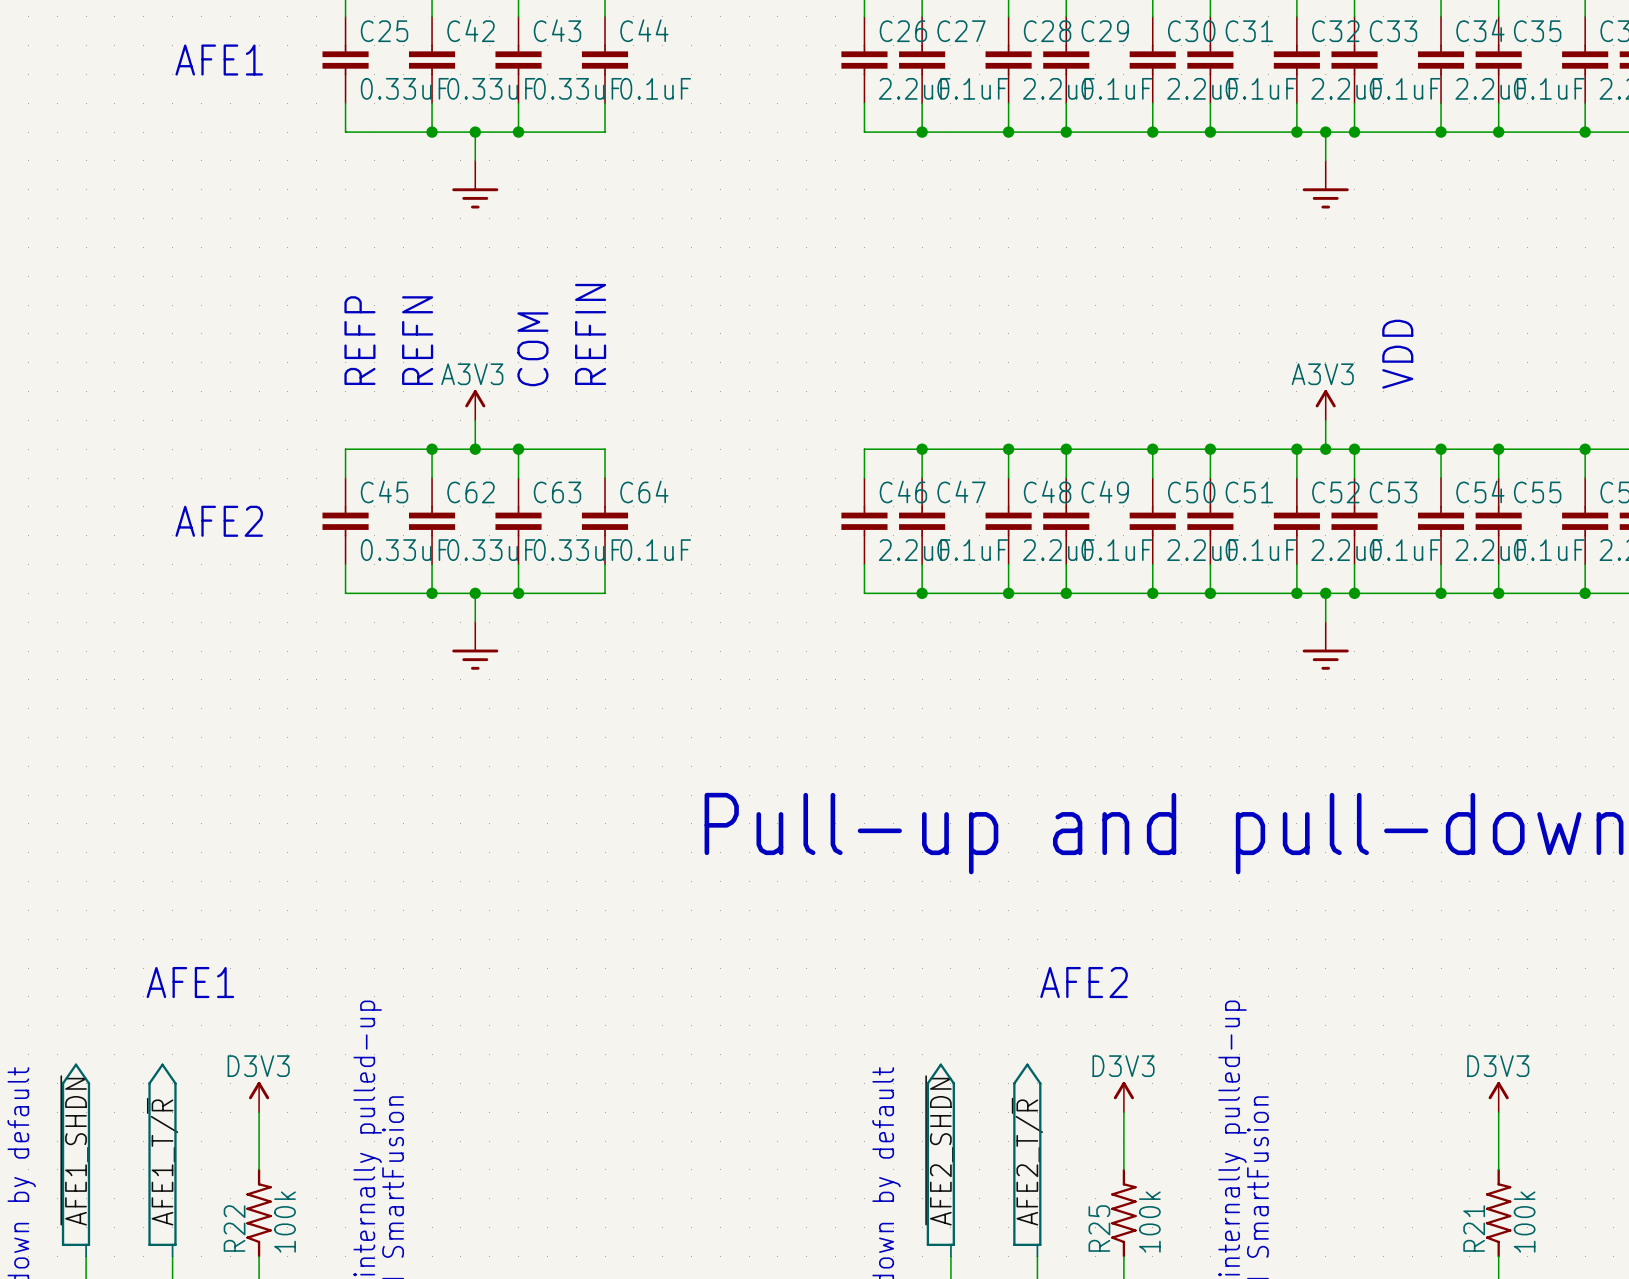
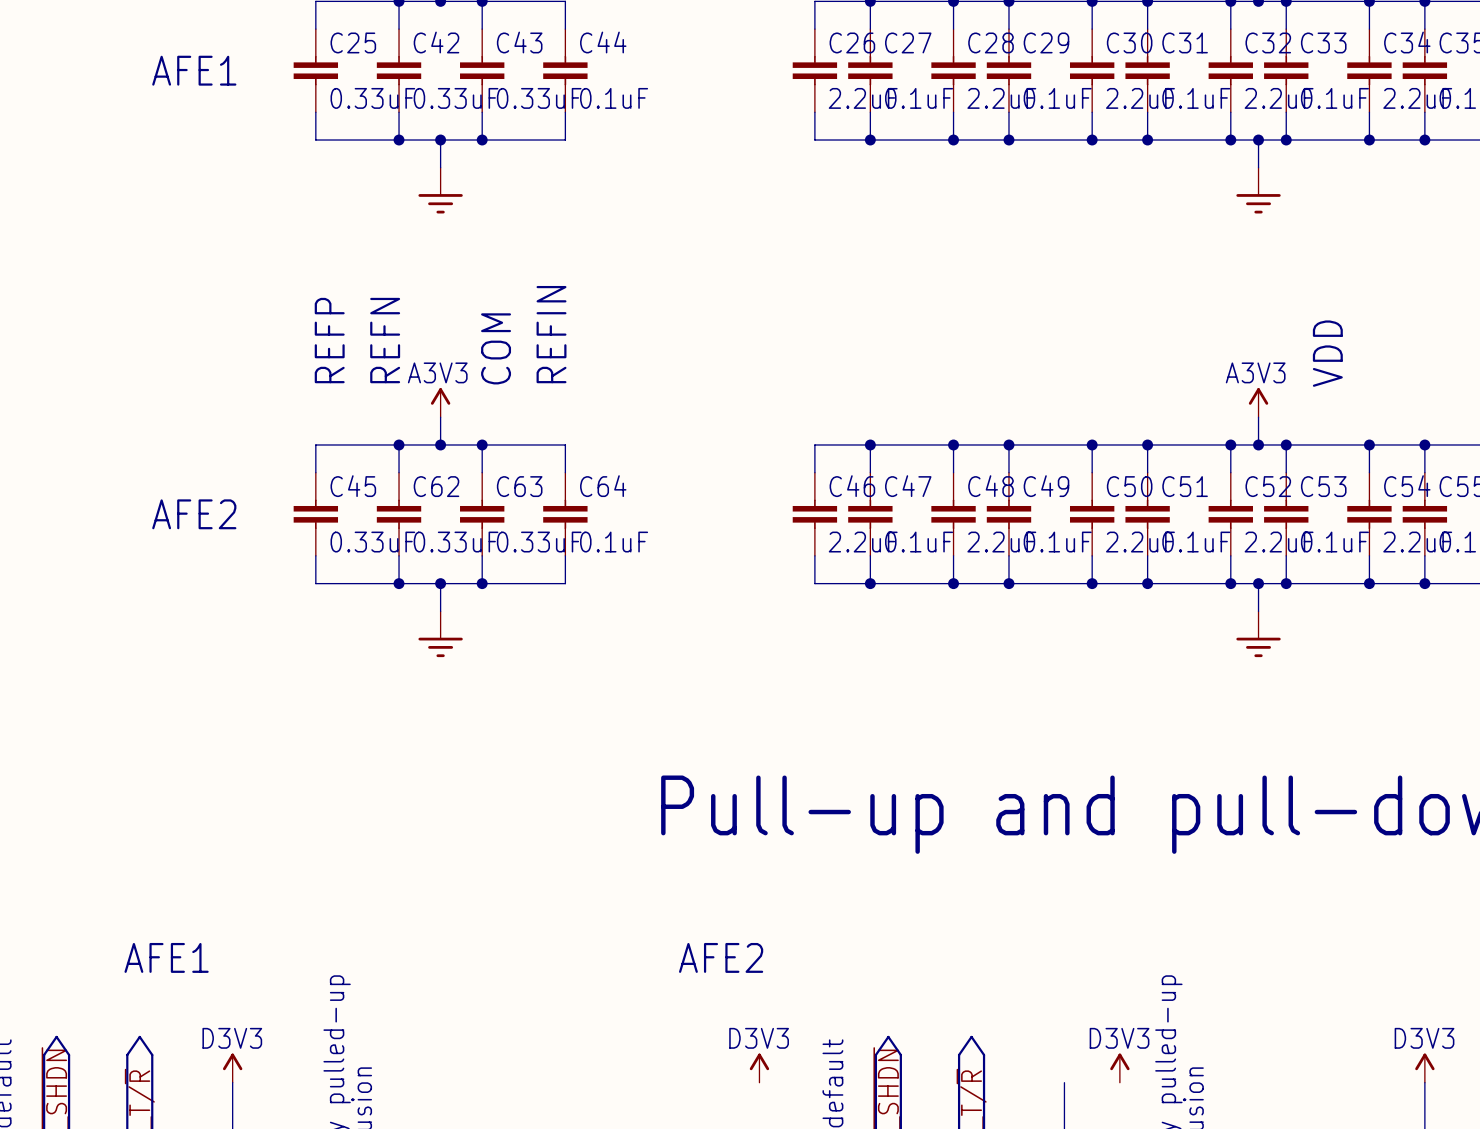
text: none -> AFE2 (721, 957)
text: AFE2 (1084, 982) -> none
power symbol: none -> D3V3 (759, 1068)
power symbol position: D3V3 (1123, 1097) -> D3V3 (1119, 1068)

